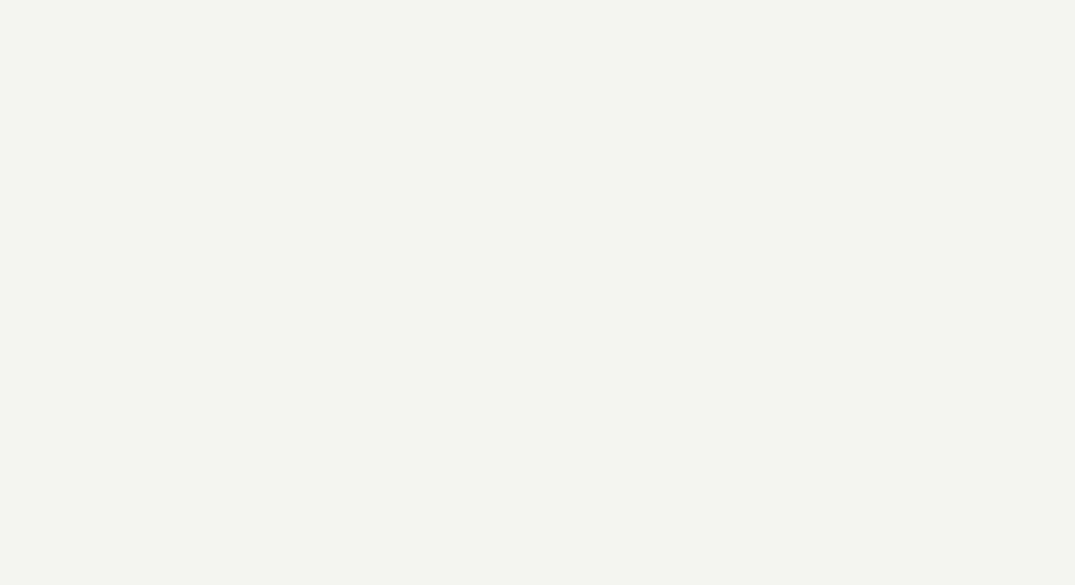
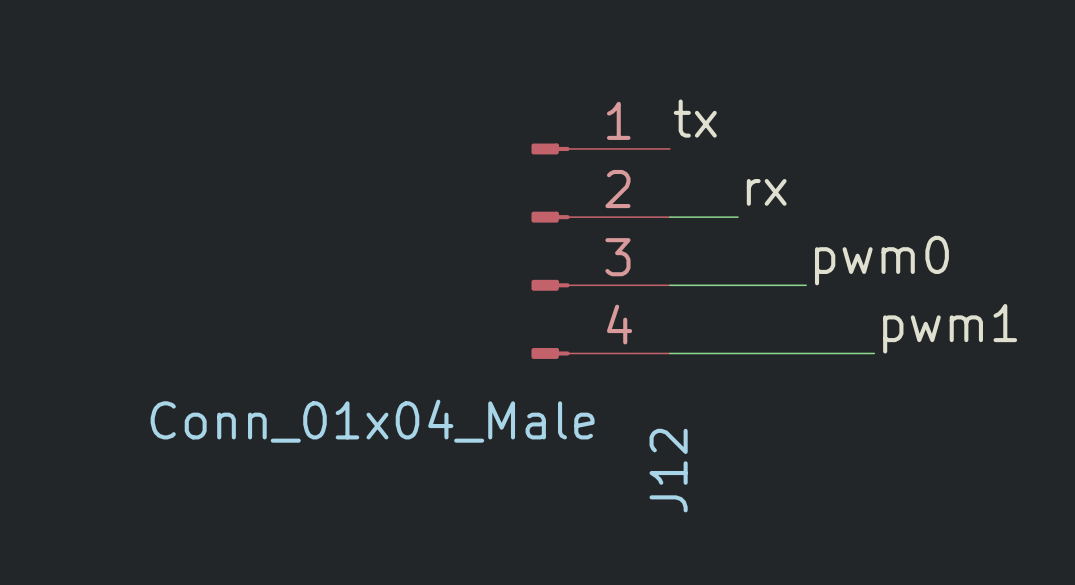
label: none -> tx (695, 118)
label: none -> rx (766, 192)
wire: none -> (669, 217) (738, 217)
J12: none -> Conn_01x04_Male (600, 251)
label: none -> pwm0 (881, 260)
wire: none -> (669, 285) (806, 285)
label: none -> pwm1 (950, 328)
wire: none -> (669, 353) (874, 353)

